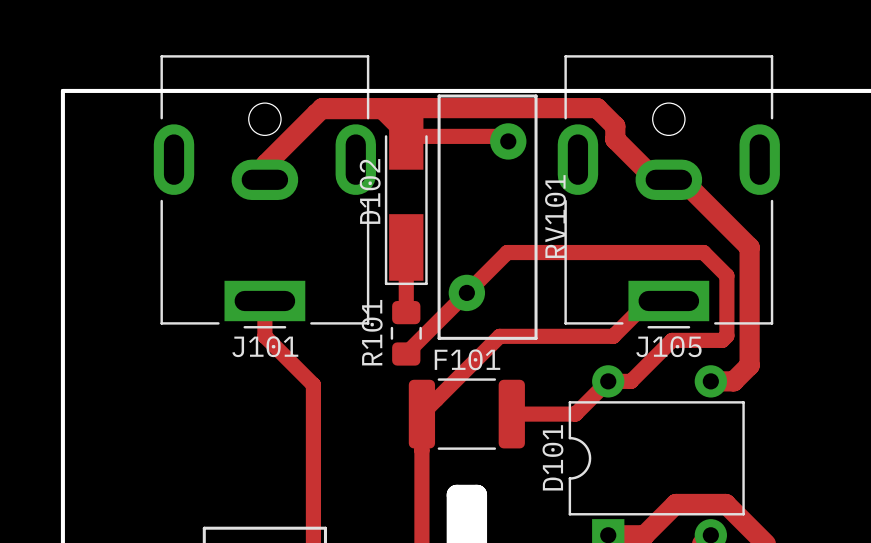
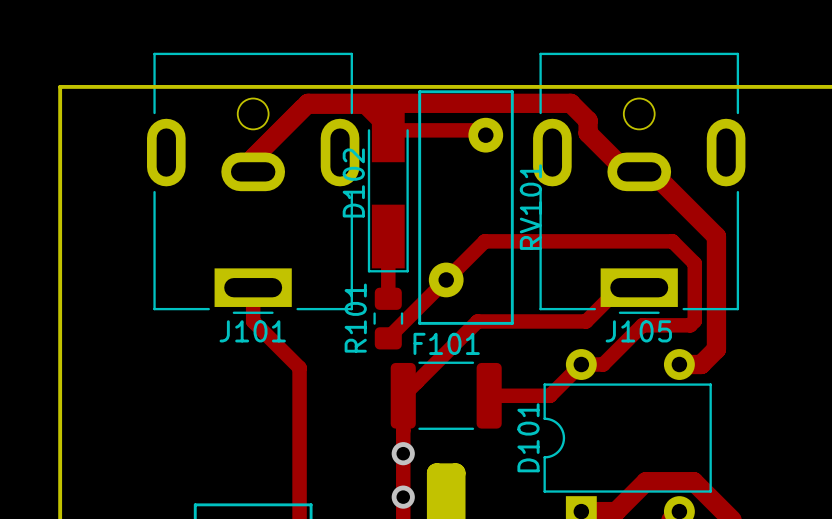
via: none -> (403, 453)
via: none -> (403, 497)

